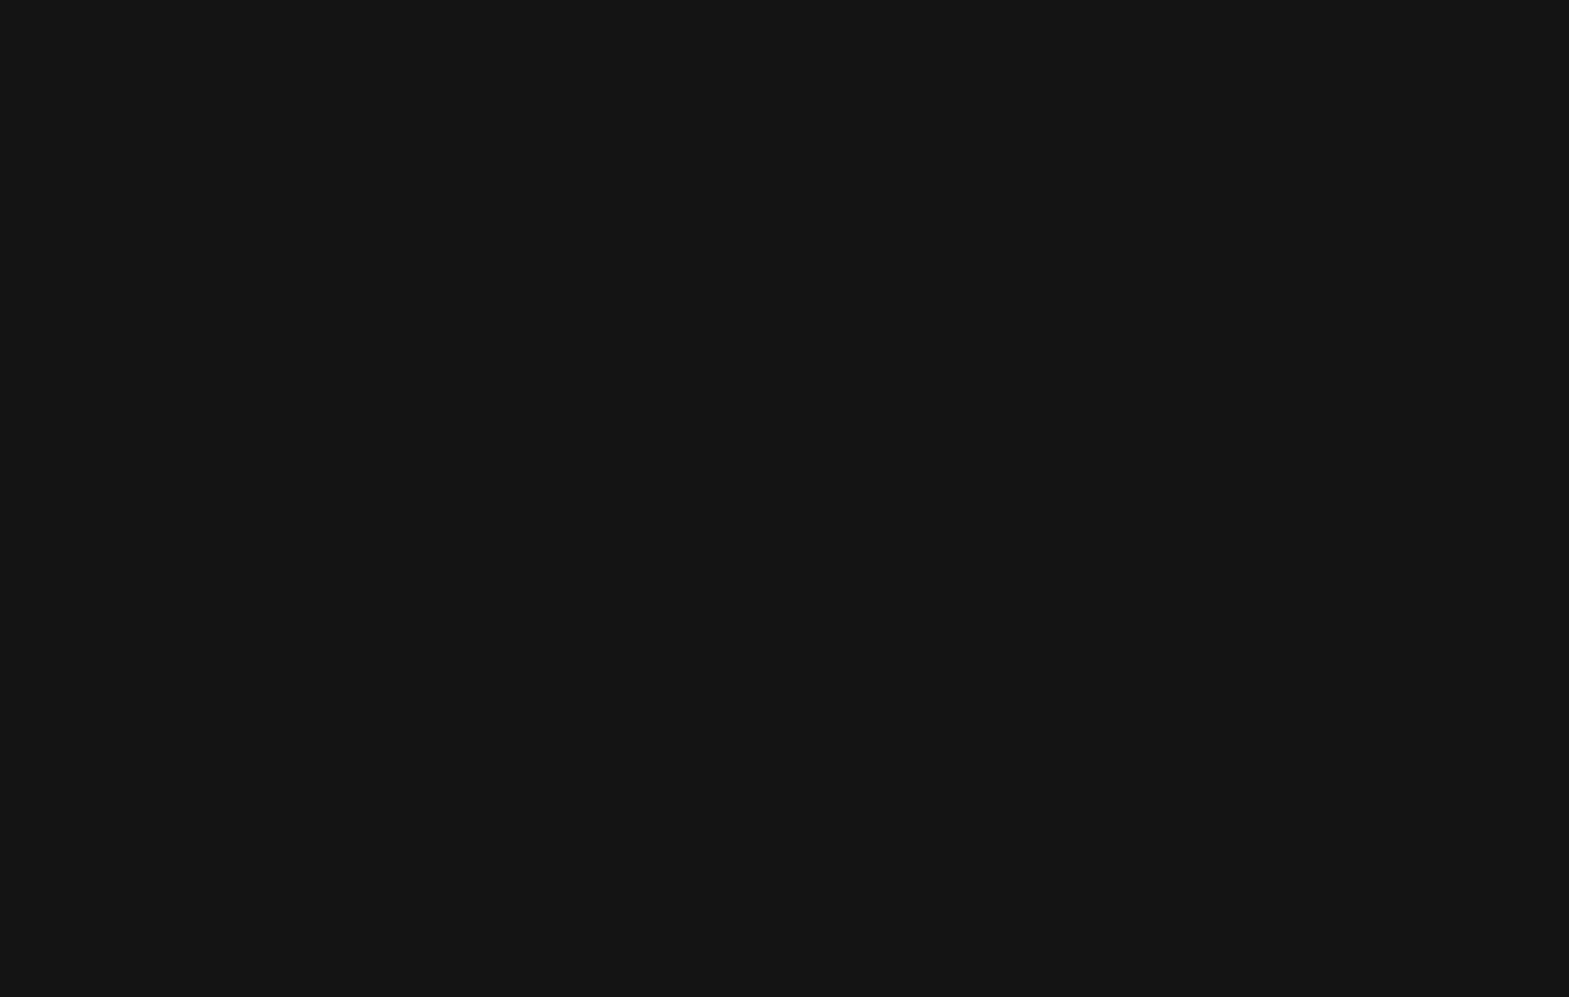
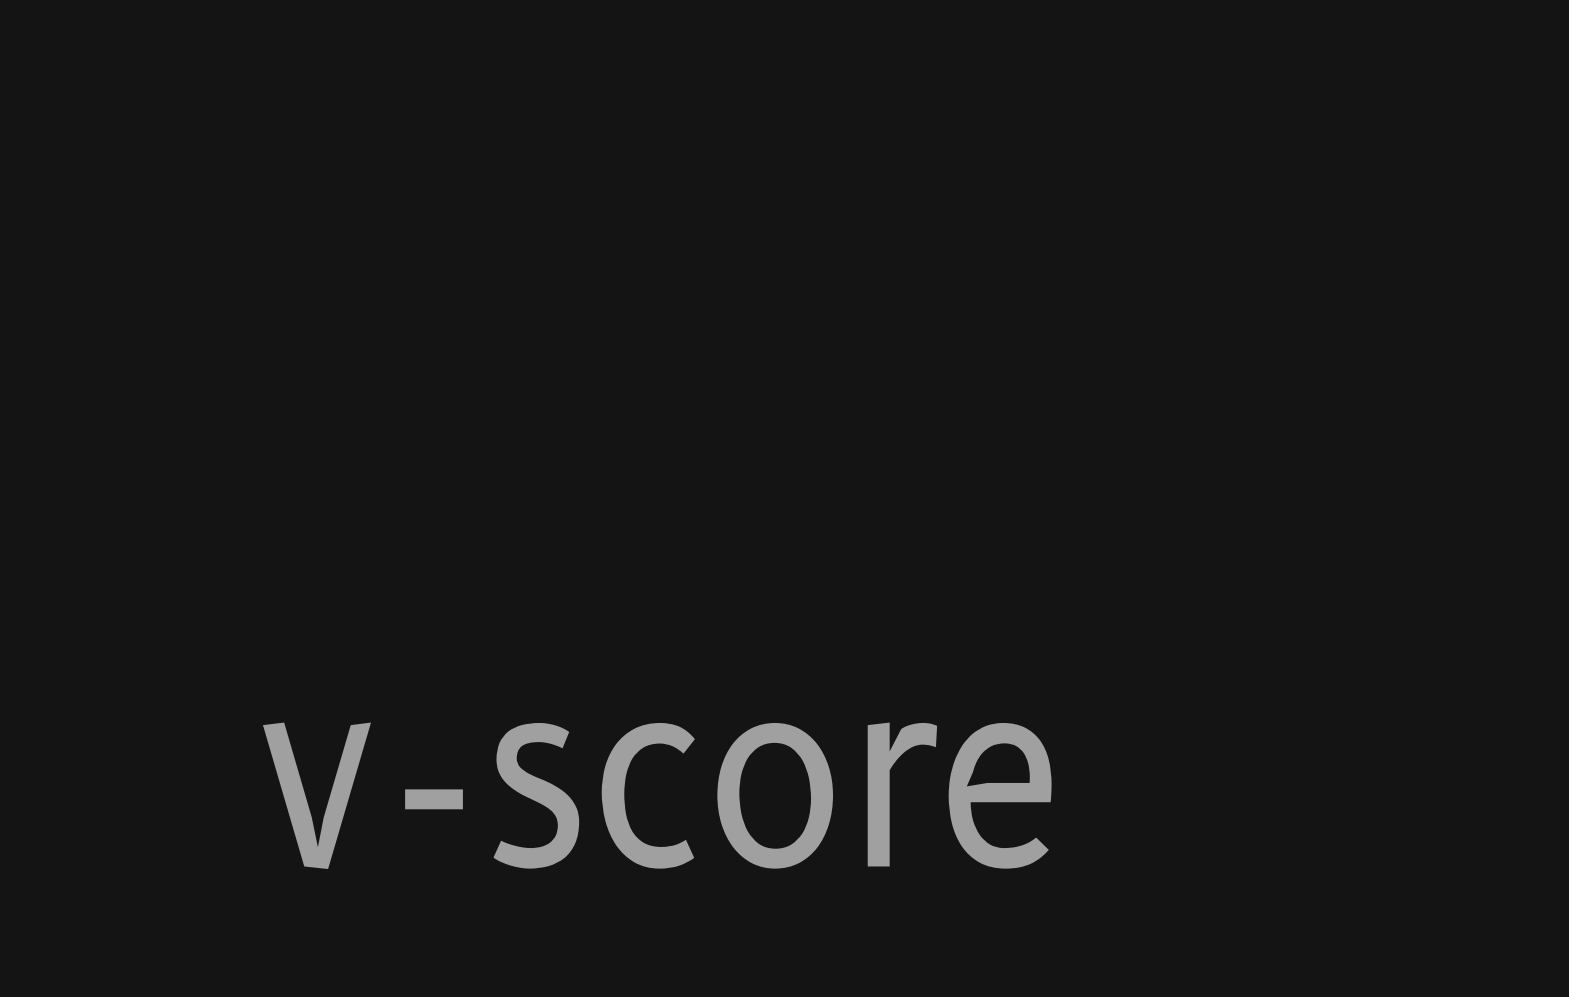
text: none -> v-score (657, 795)

